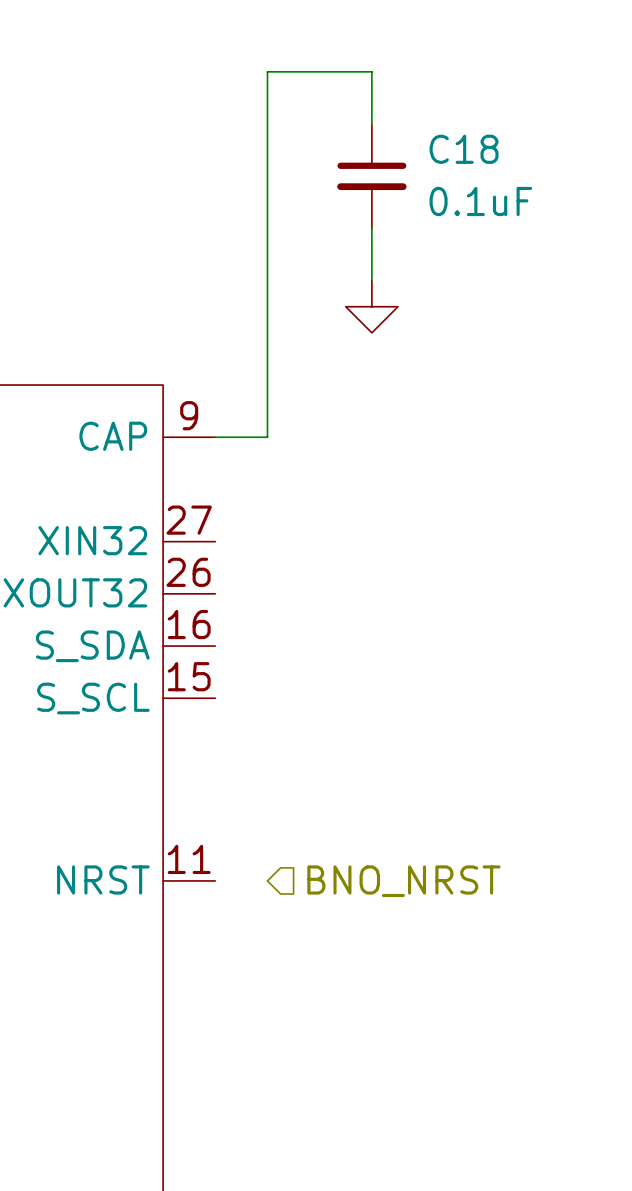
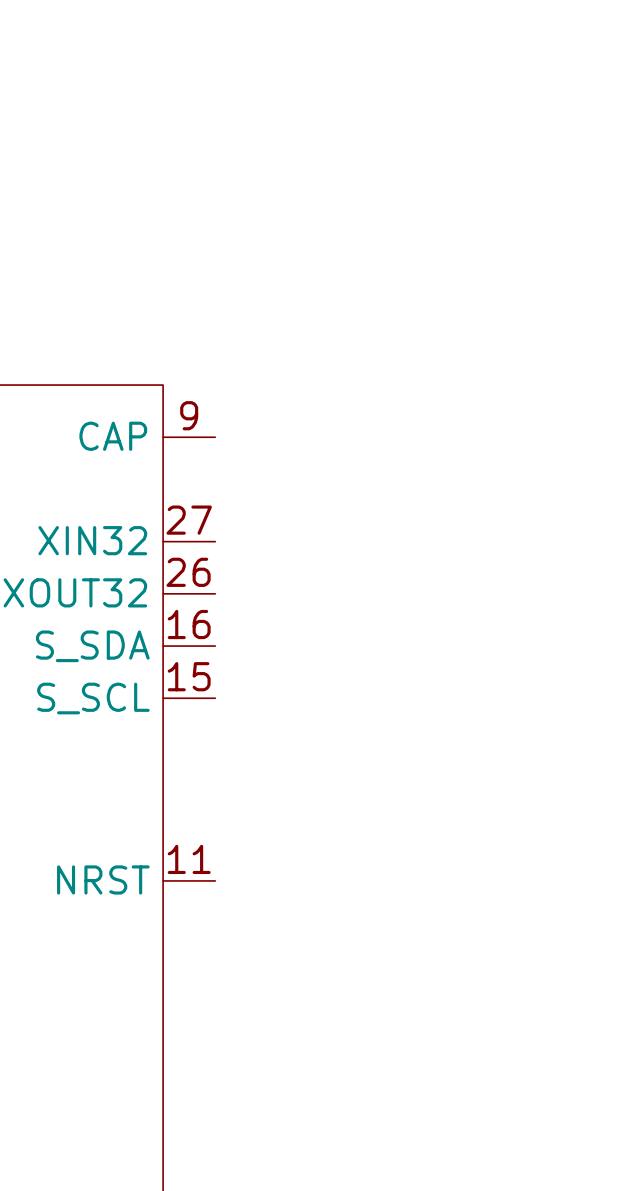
wire: (371, 124) (371, 71) (267, 71) (267, 437) (215, 437) -> none
C18: 0.1uF (371, 176) -> none
wire: (371, 228) (371, 280) -> none
power symbol: (371, 306) -> none
hierarchical label: BNO_NRST (403, 881) -> none

